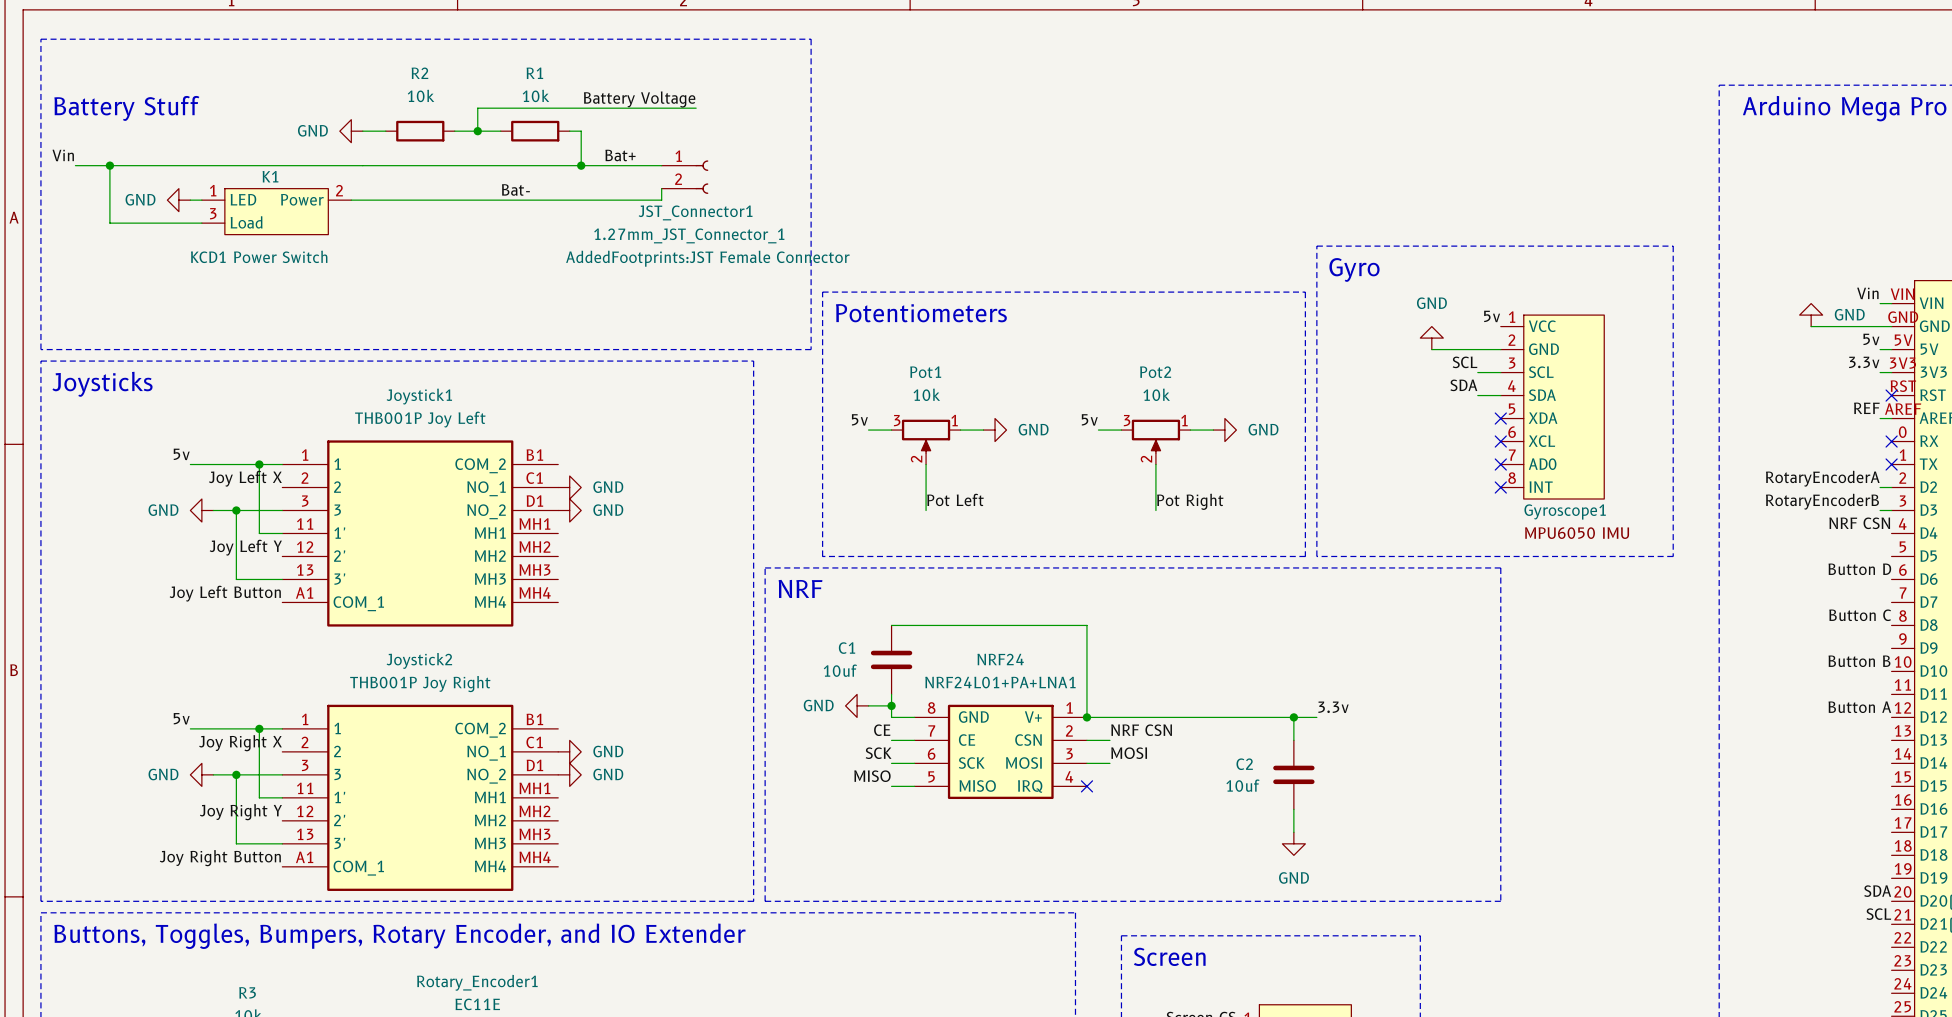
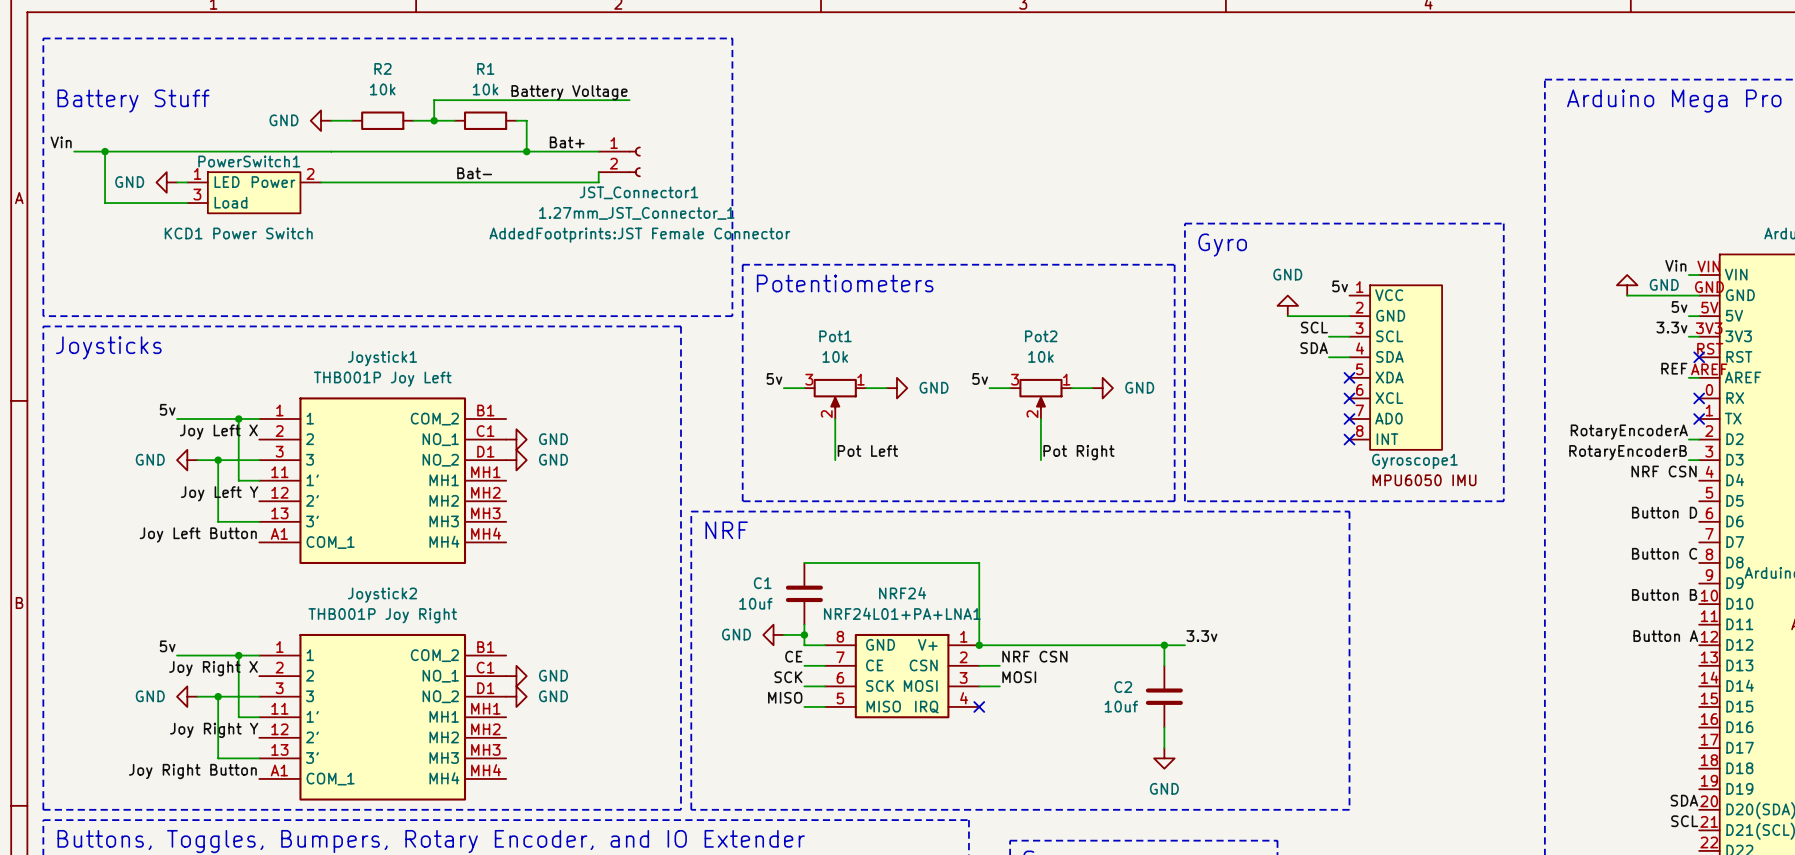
K1 name: K1 (270, 176) -> PowerSwitch1 (249, 161)

